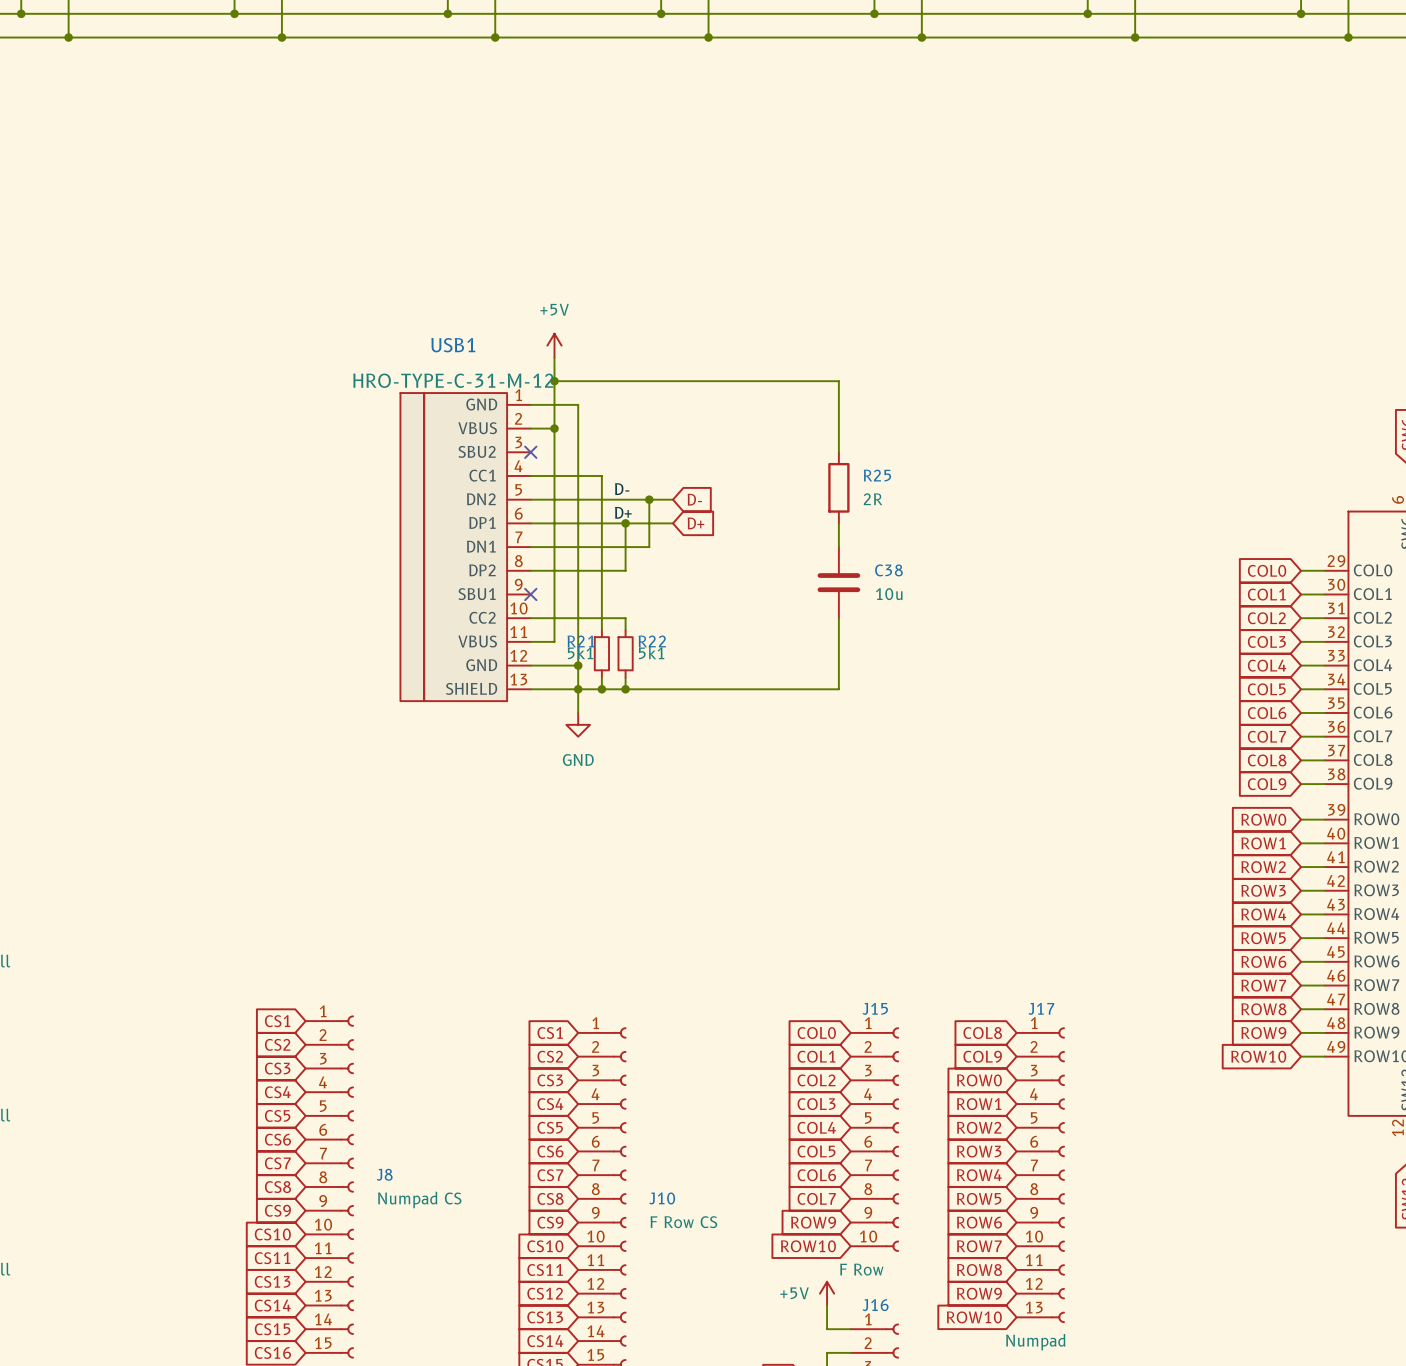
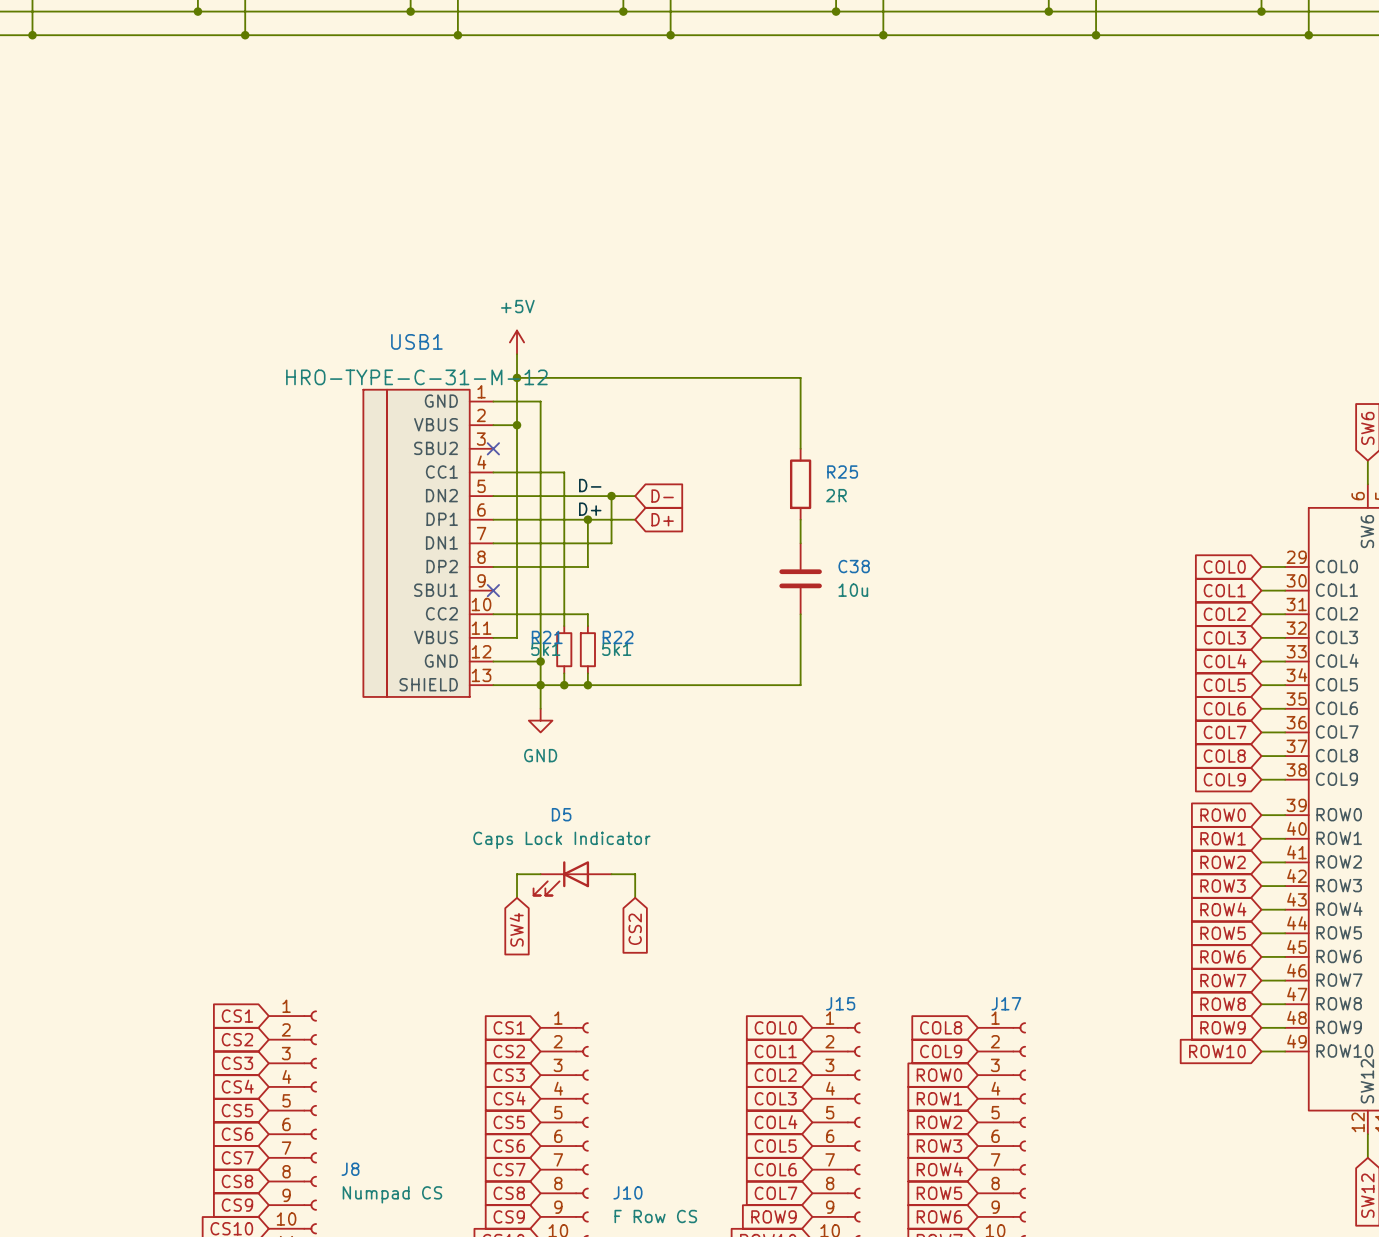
wire: none -> (540, 874) (517, 874) (517, 897)
wire: none -> (611, 874) (635, 874) (635, 897)
D5: none -> Caps Lock Indicator (572, 878)
global label: none -> CS2 (635, 929)
global label: none -> SW4 (516, 929)

